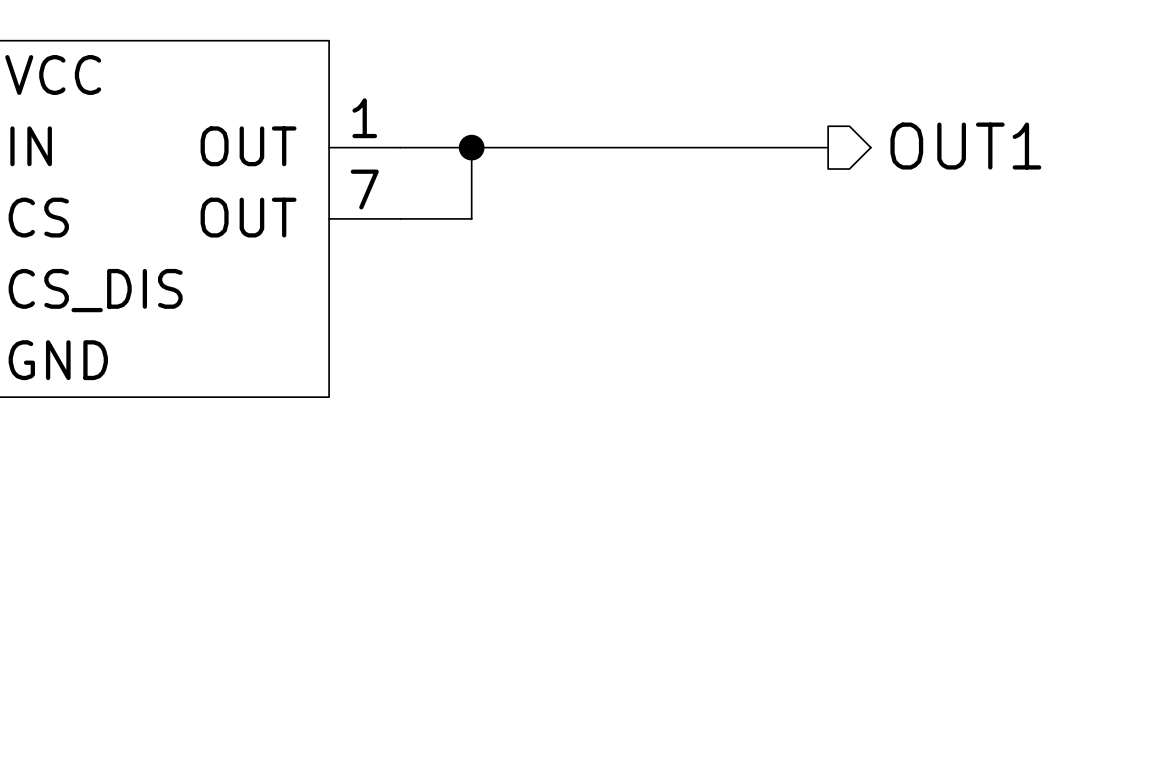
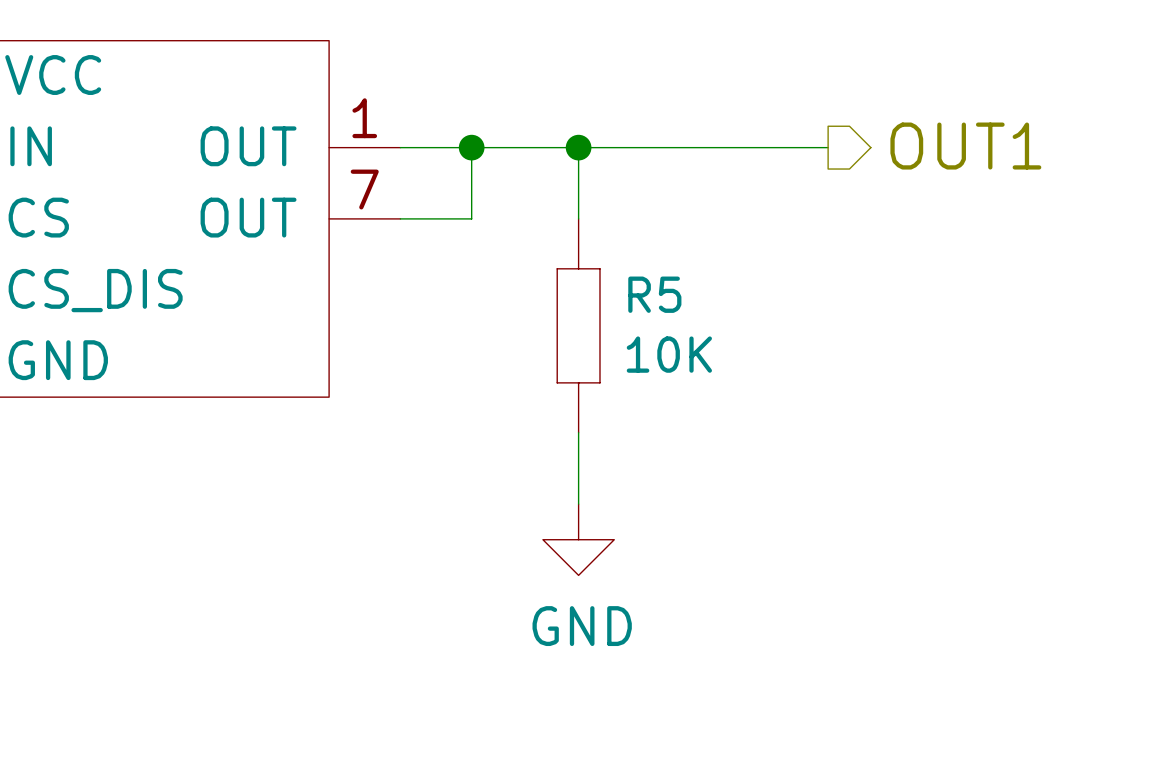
wire: none -> (578, 147) (578, 218)
junction: none -> (578, 147)
R5: none -> 10K (578, 325)
wire: none -> (578, 432) (578, 504)
power symbol: none -> GND (578, 539)

